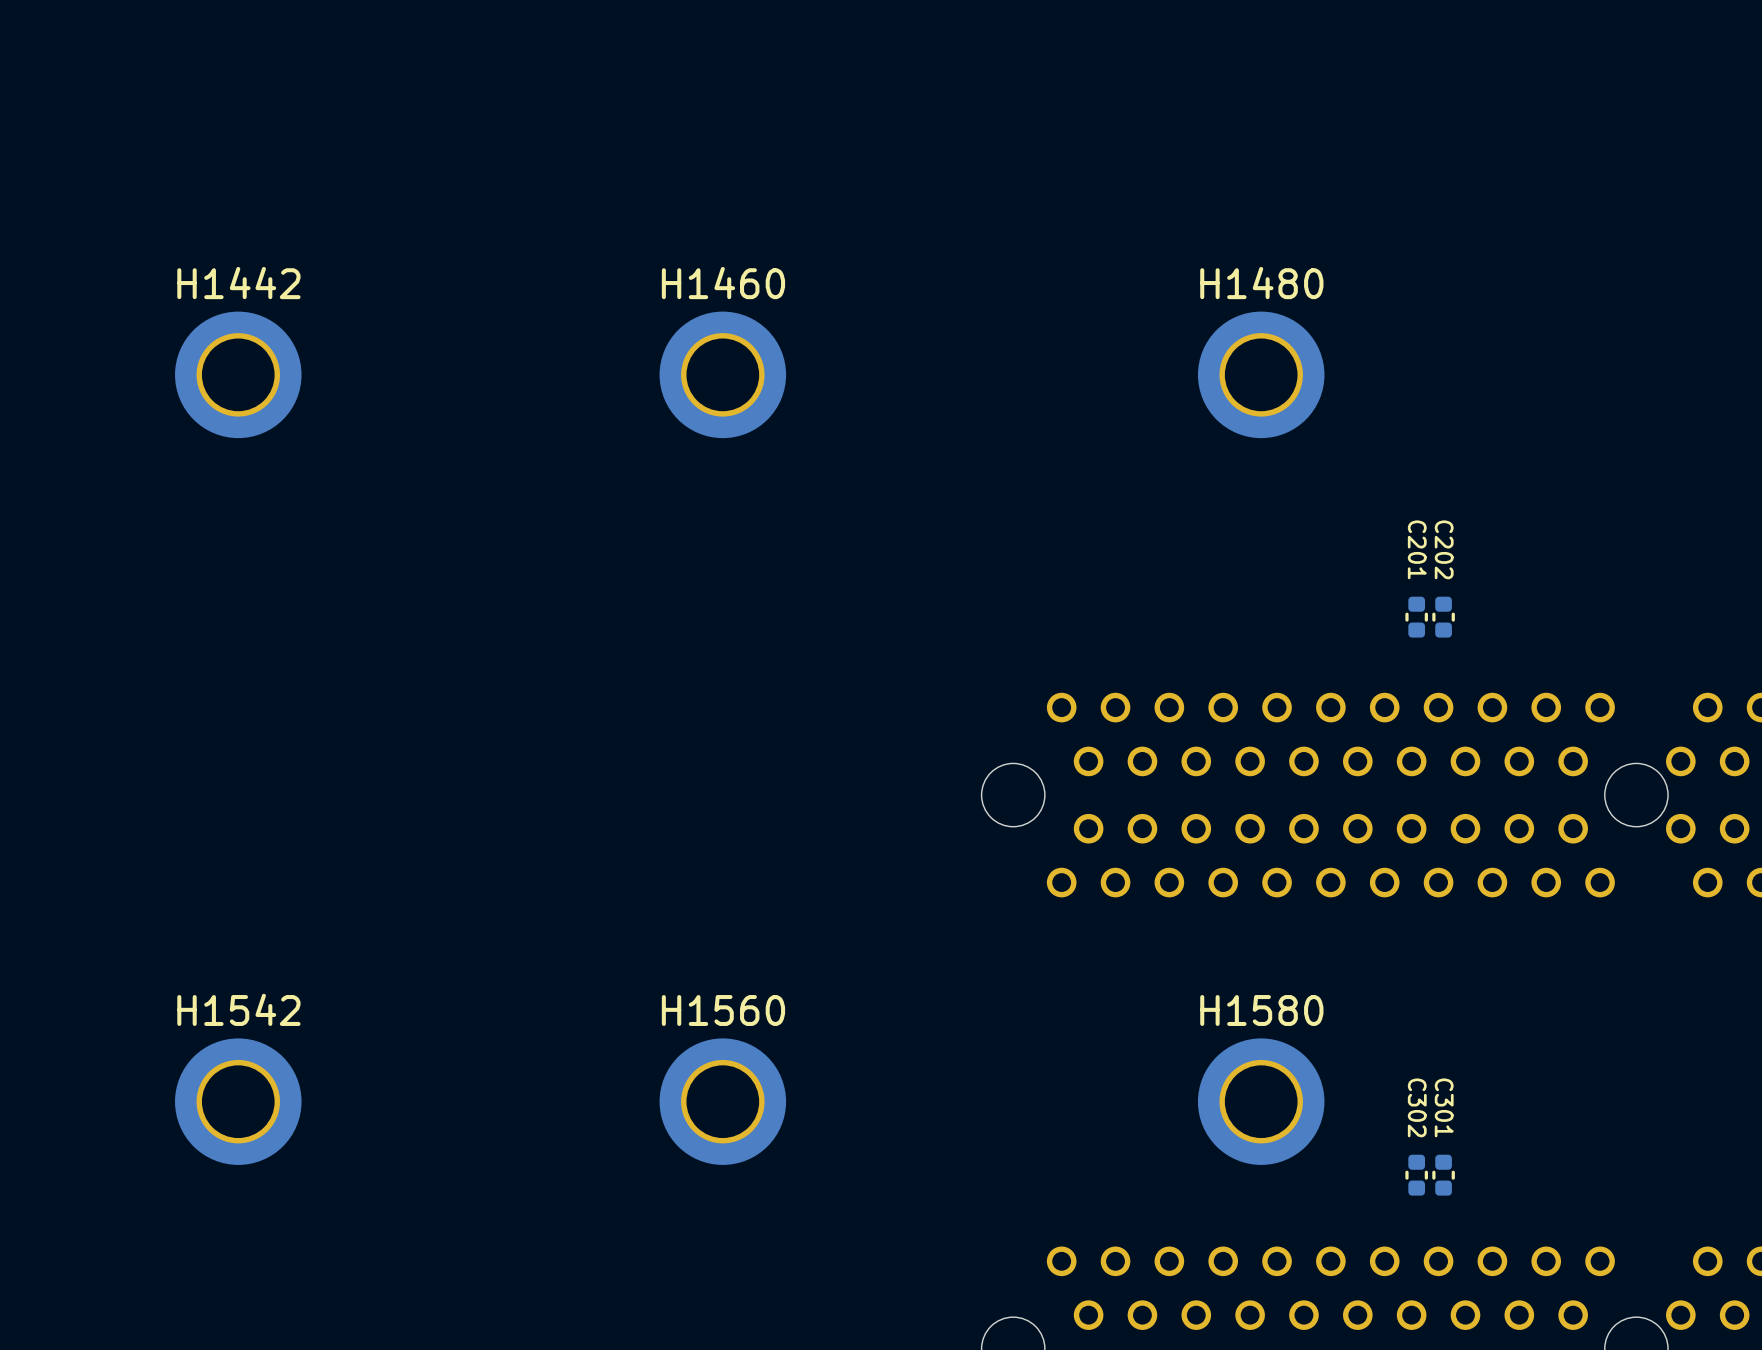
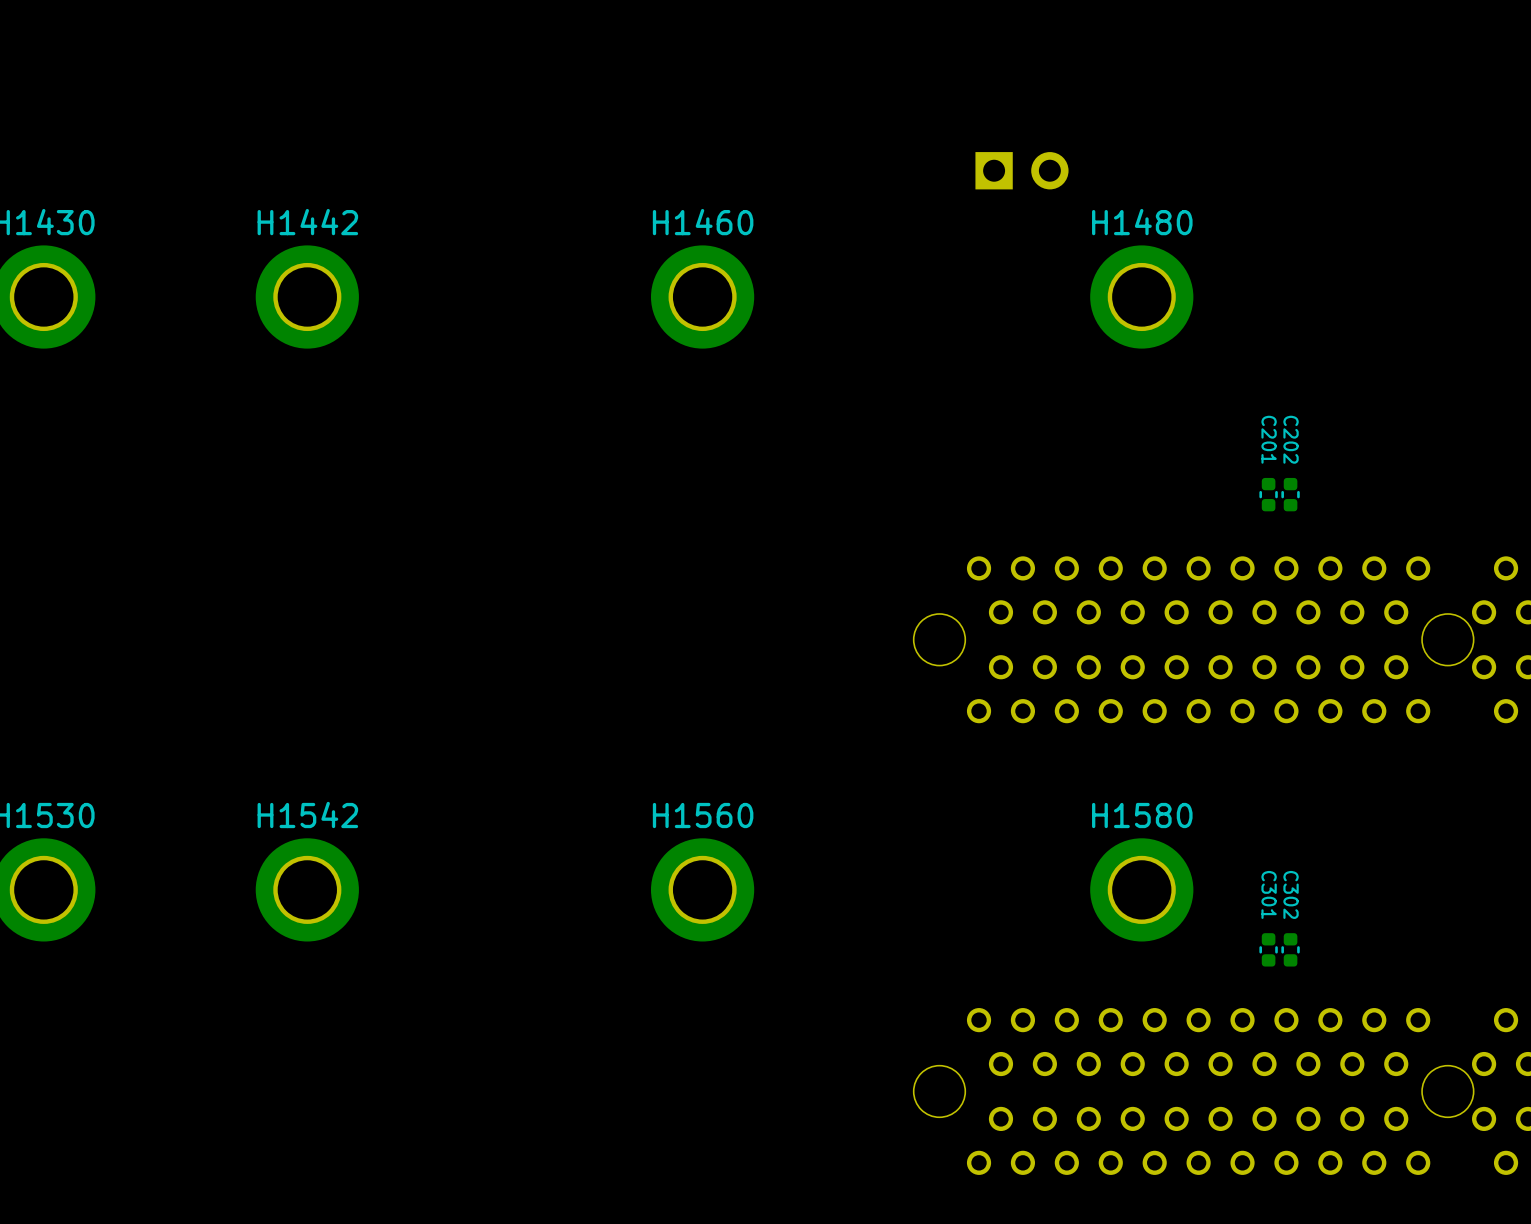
part: none -> (1021, 170)
C302 name: C302 (1417, 1107) -> C301 (1269, 894)
C301 name: C301 (1444, 1107) -> C302 (1291, 894)

